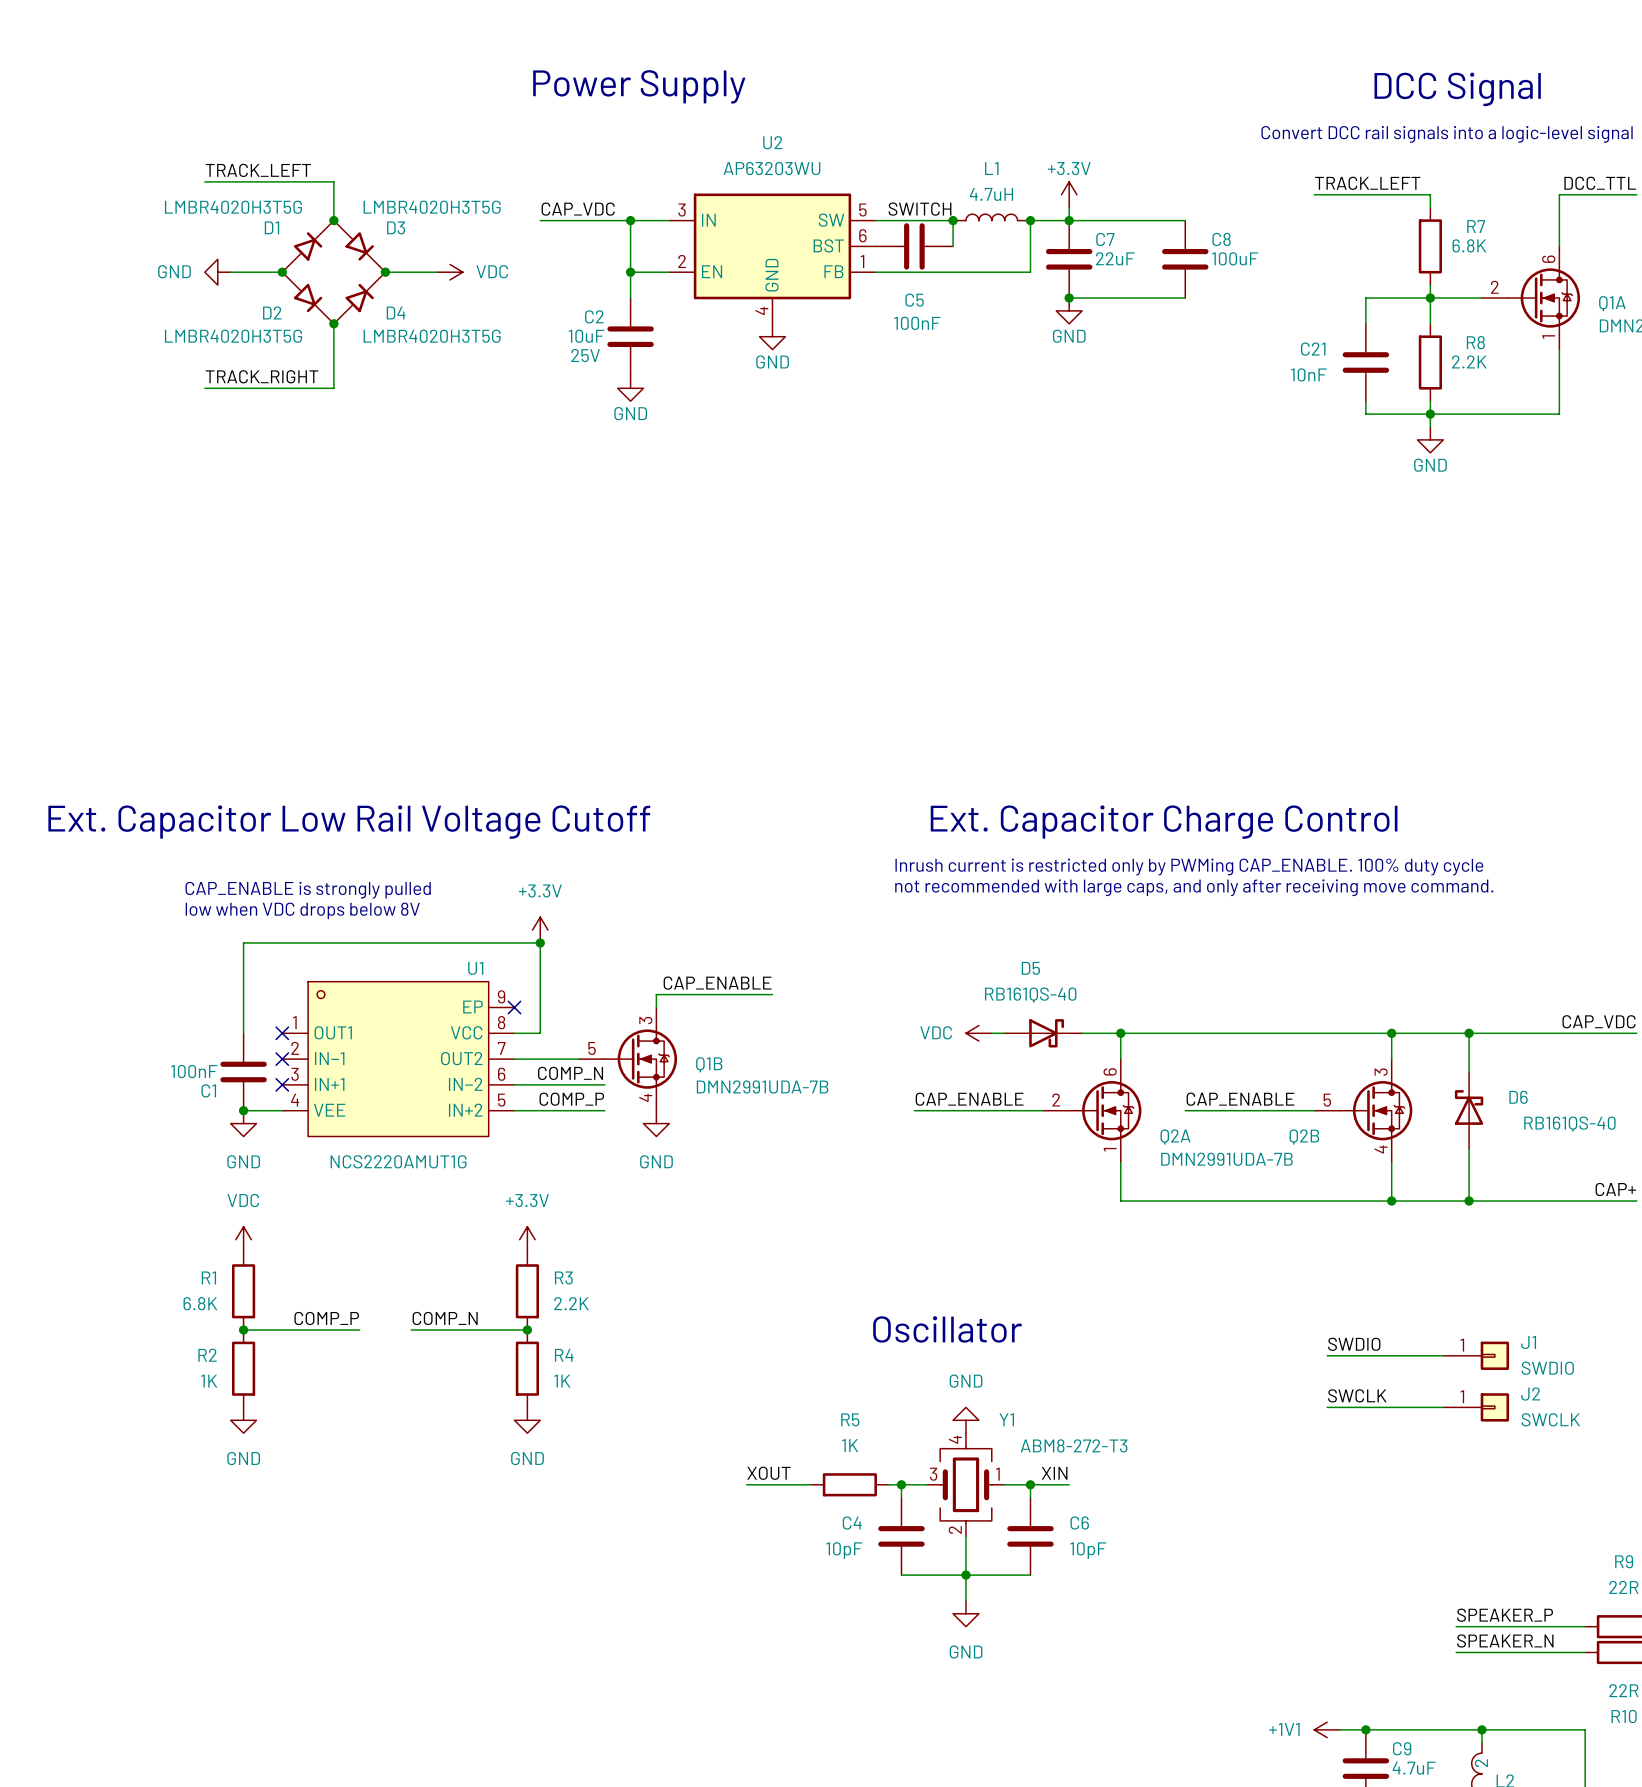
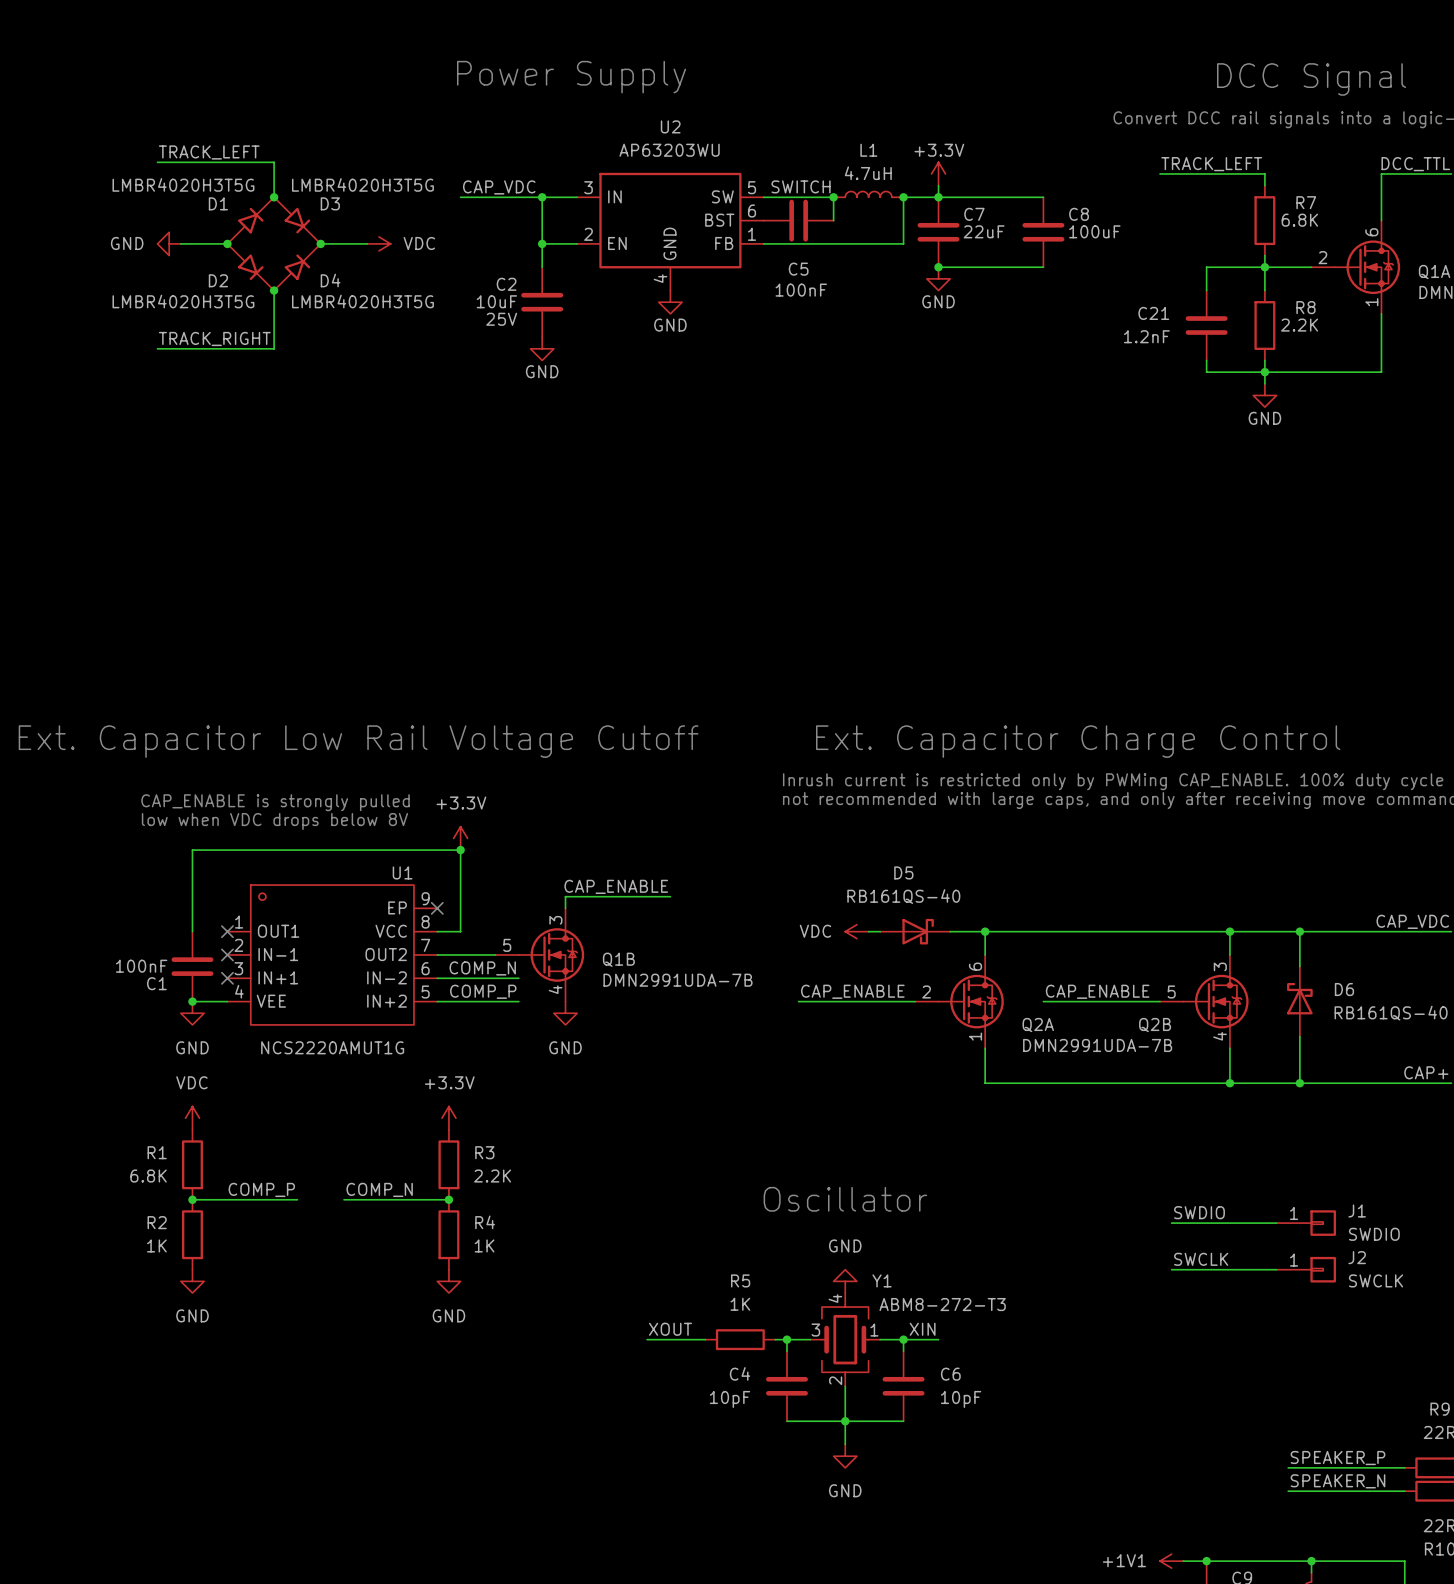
C21 value: 10nF (1308, 374) -> 1.2nF (1146, 336)

